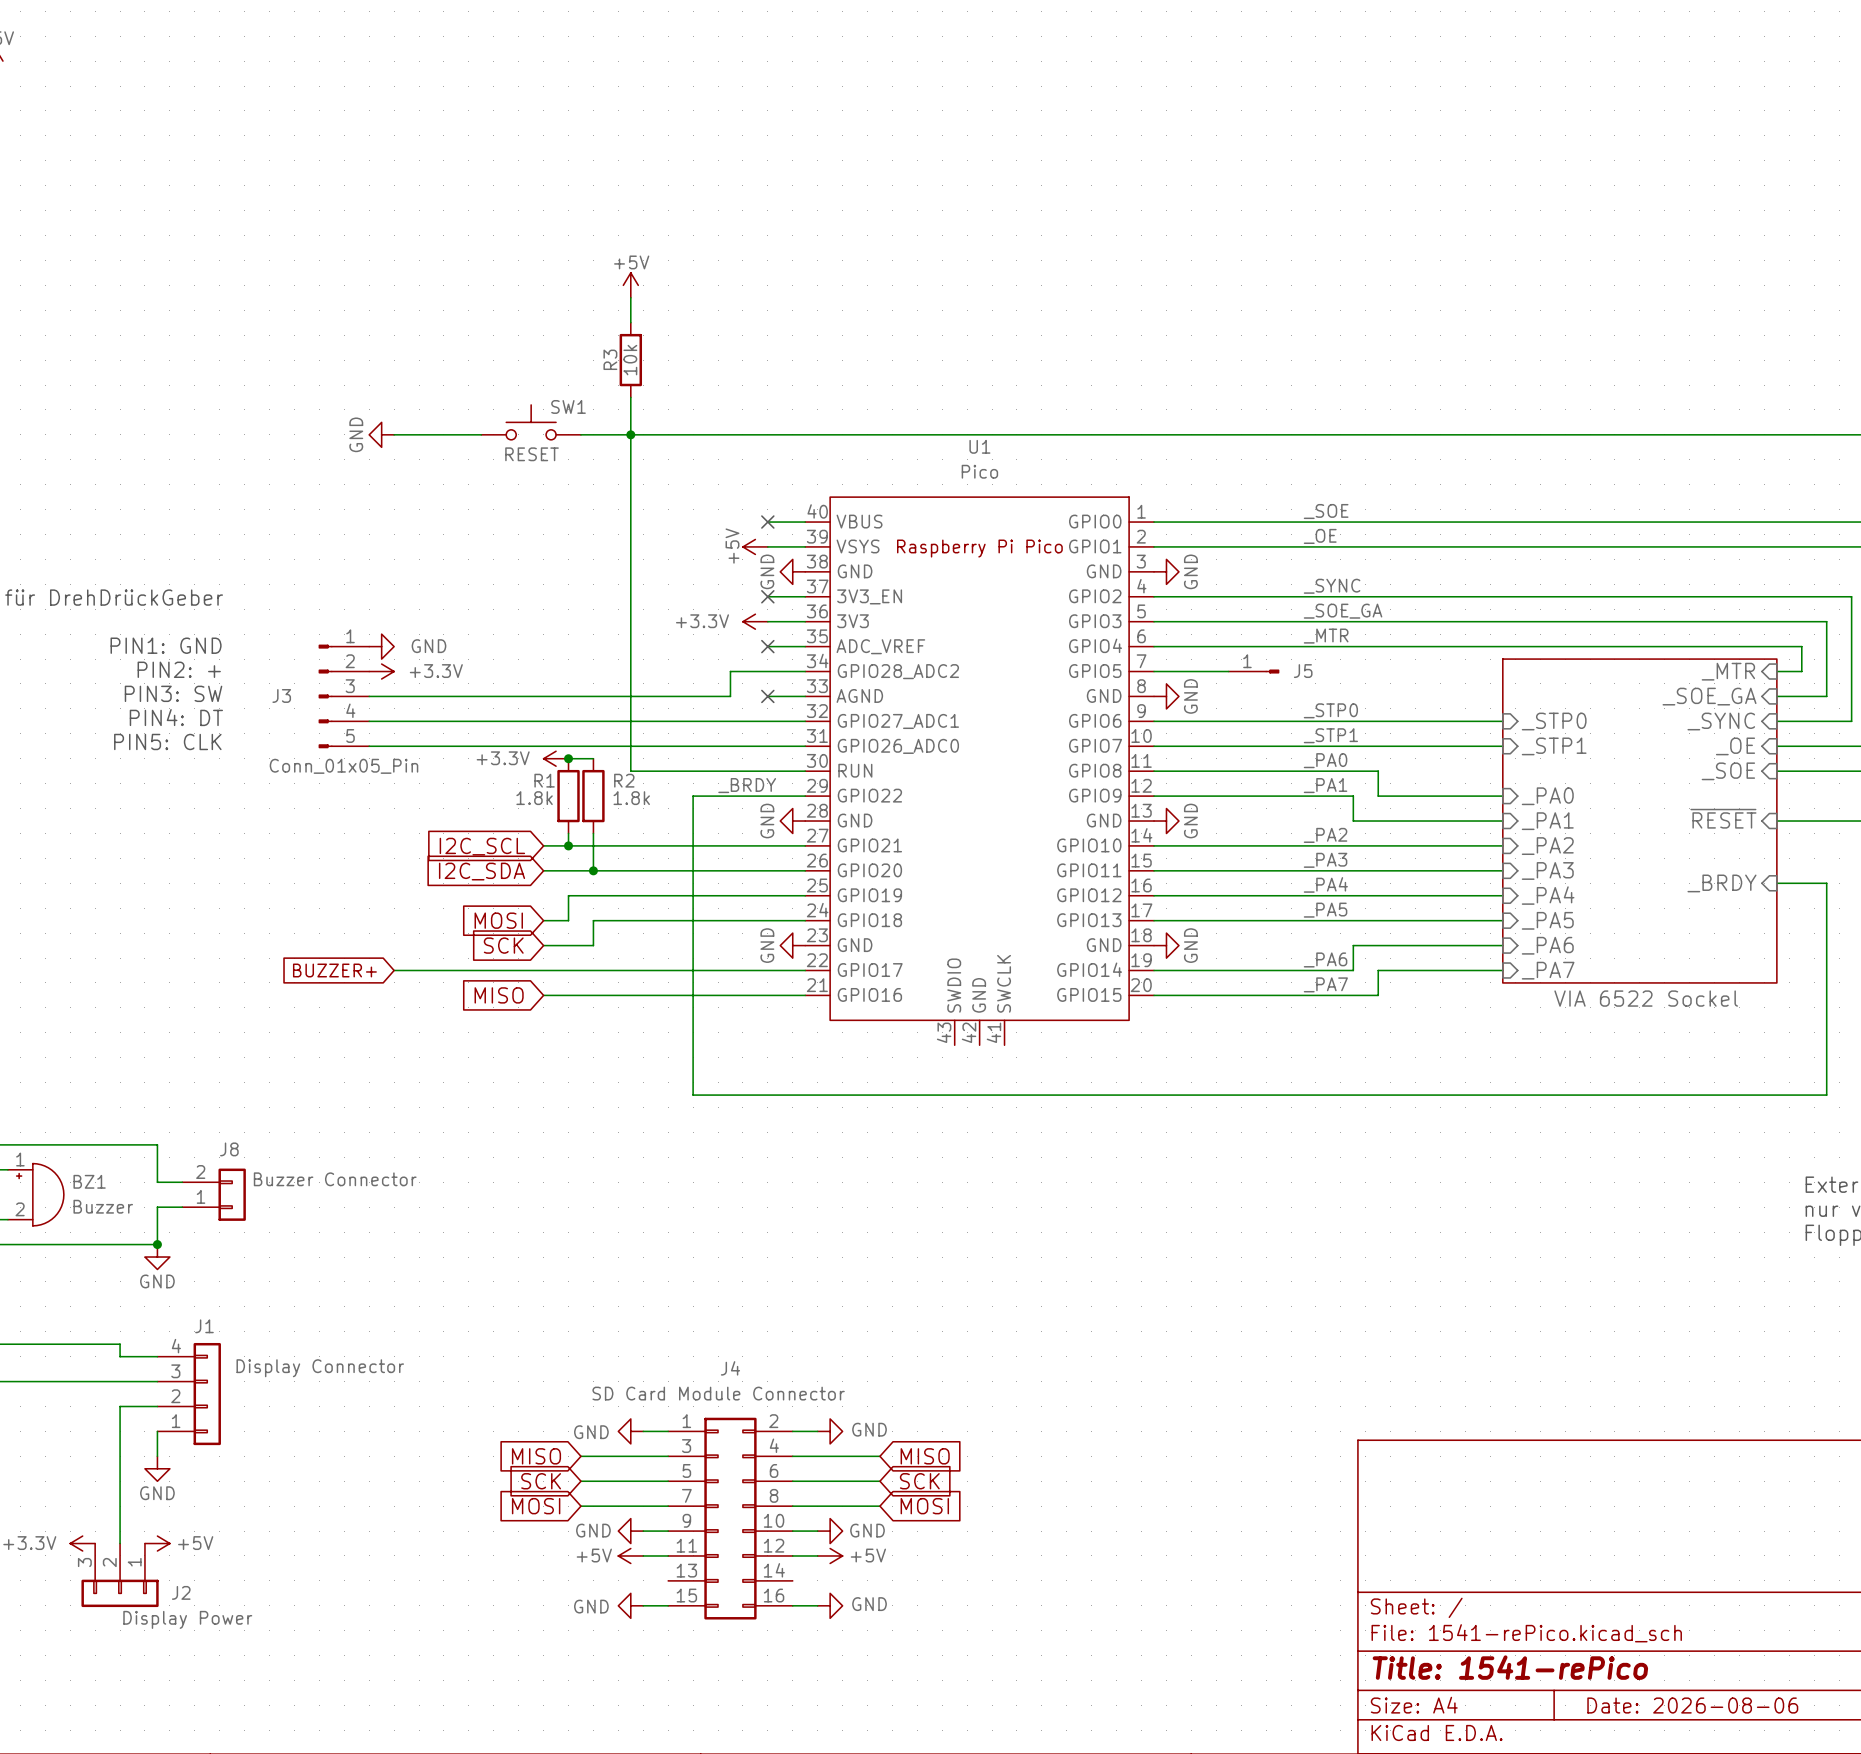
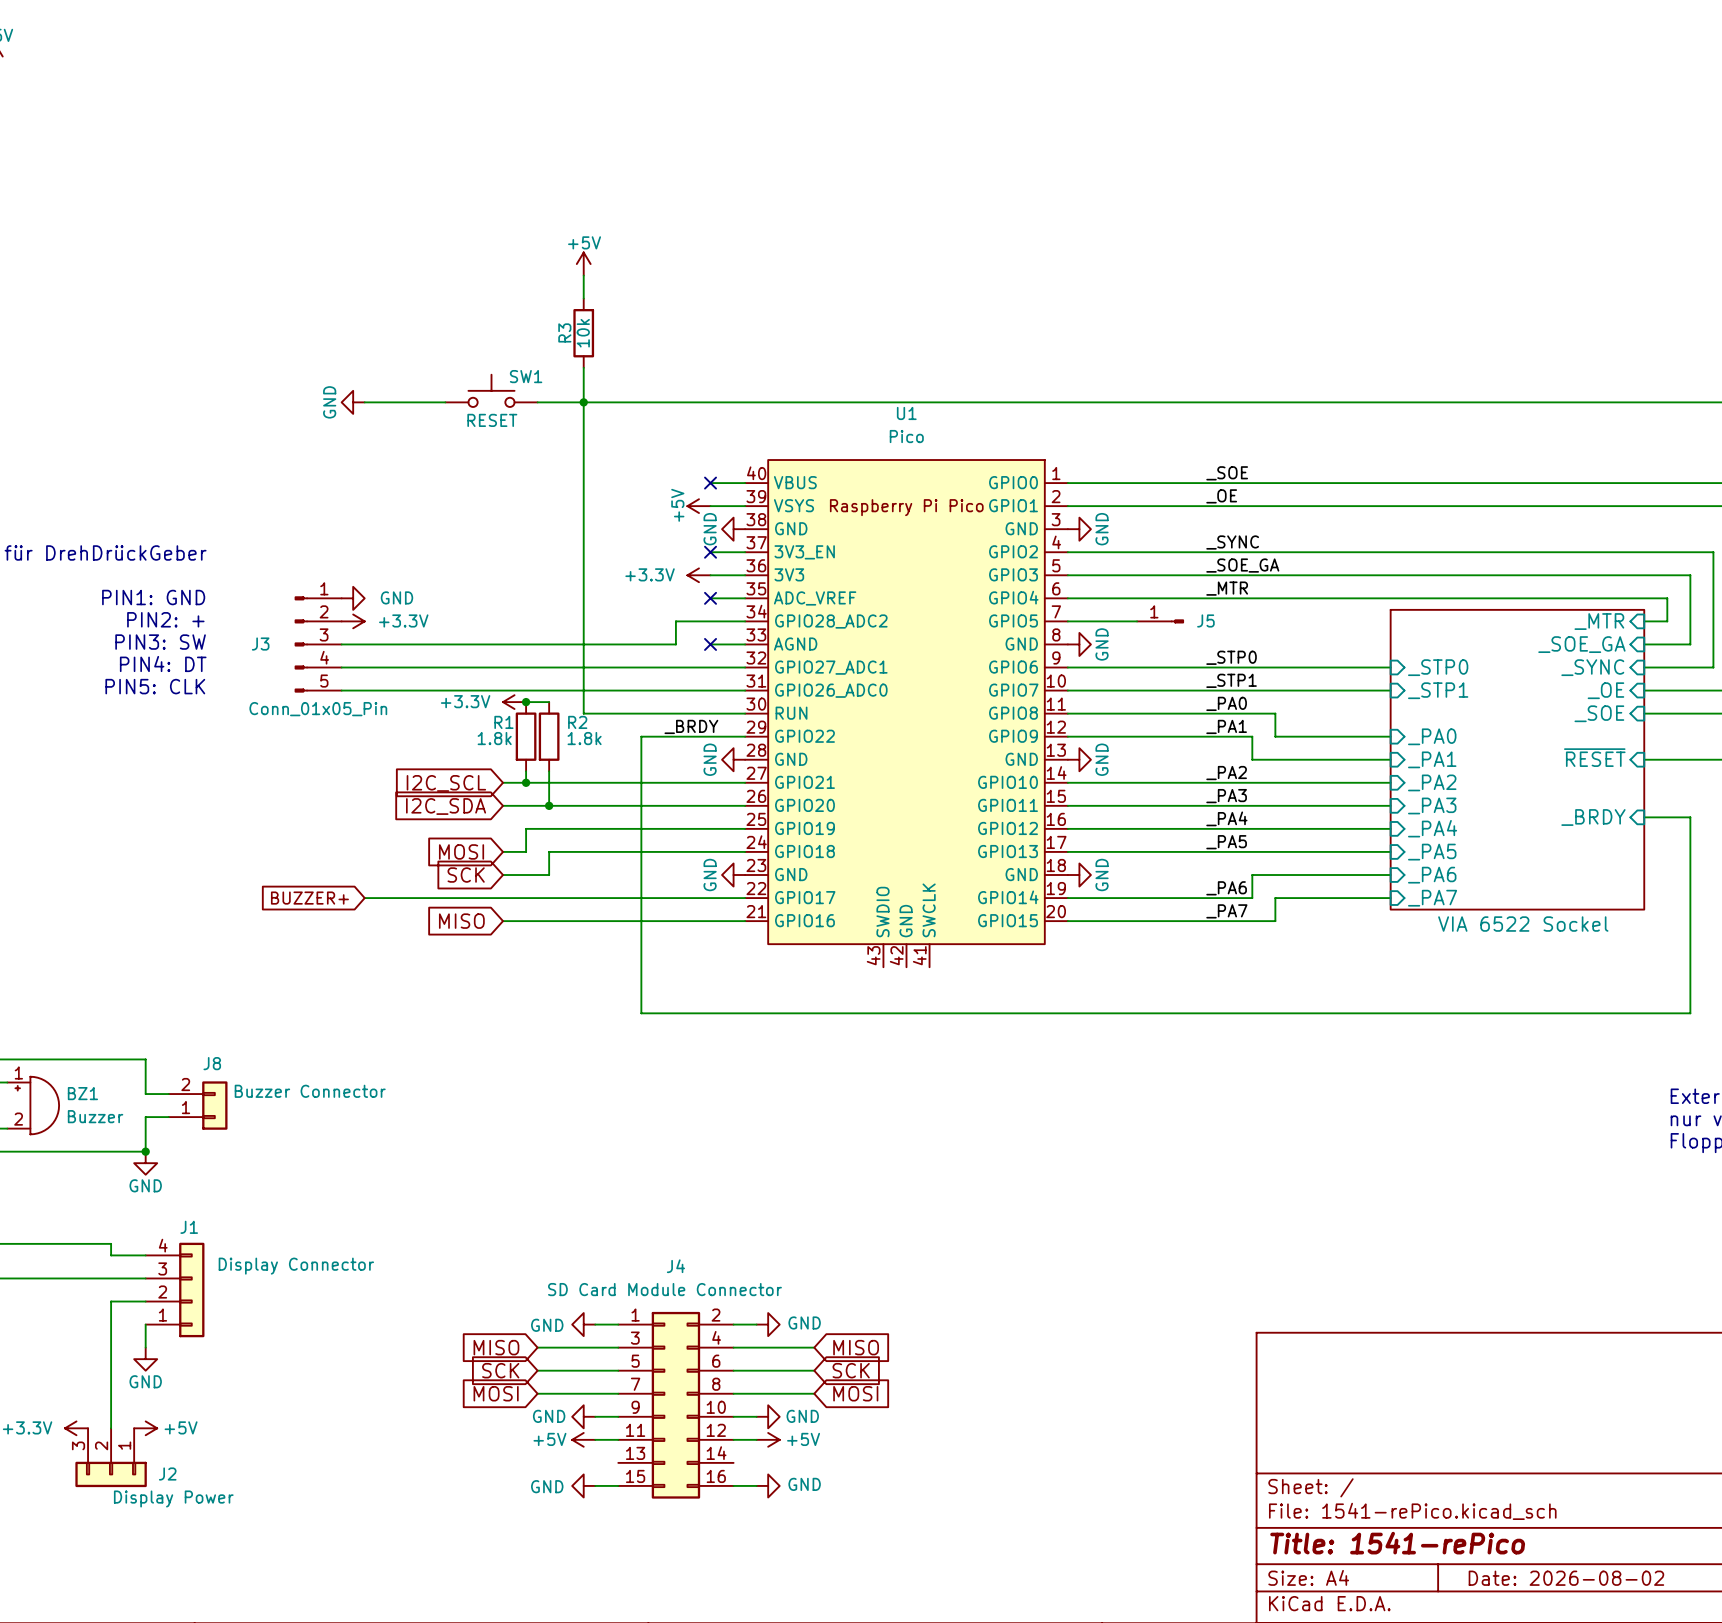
title block: Date: 2026-08-06 (1692, 1705) -> Date: 2026-08-02 (1566, 1578)

